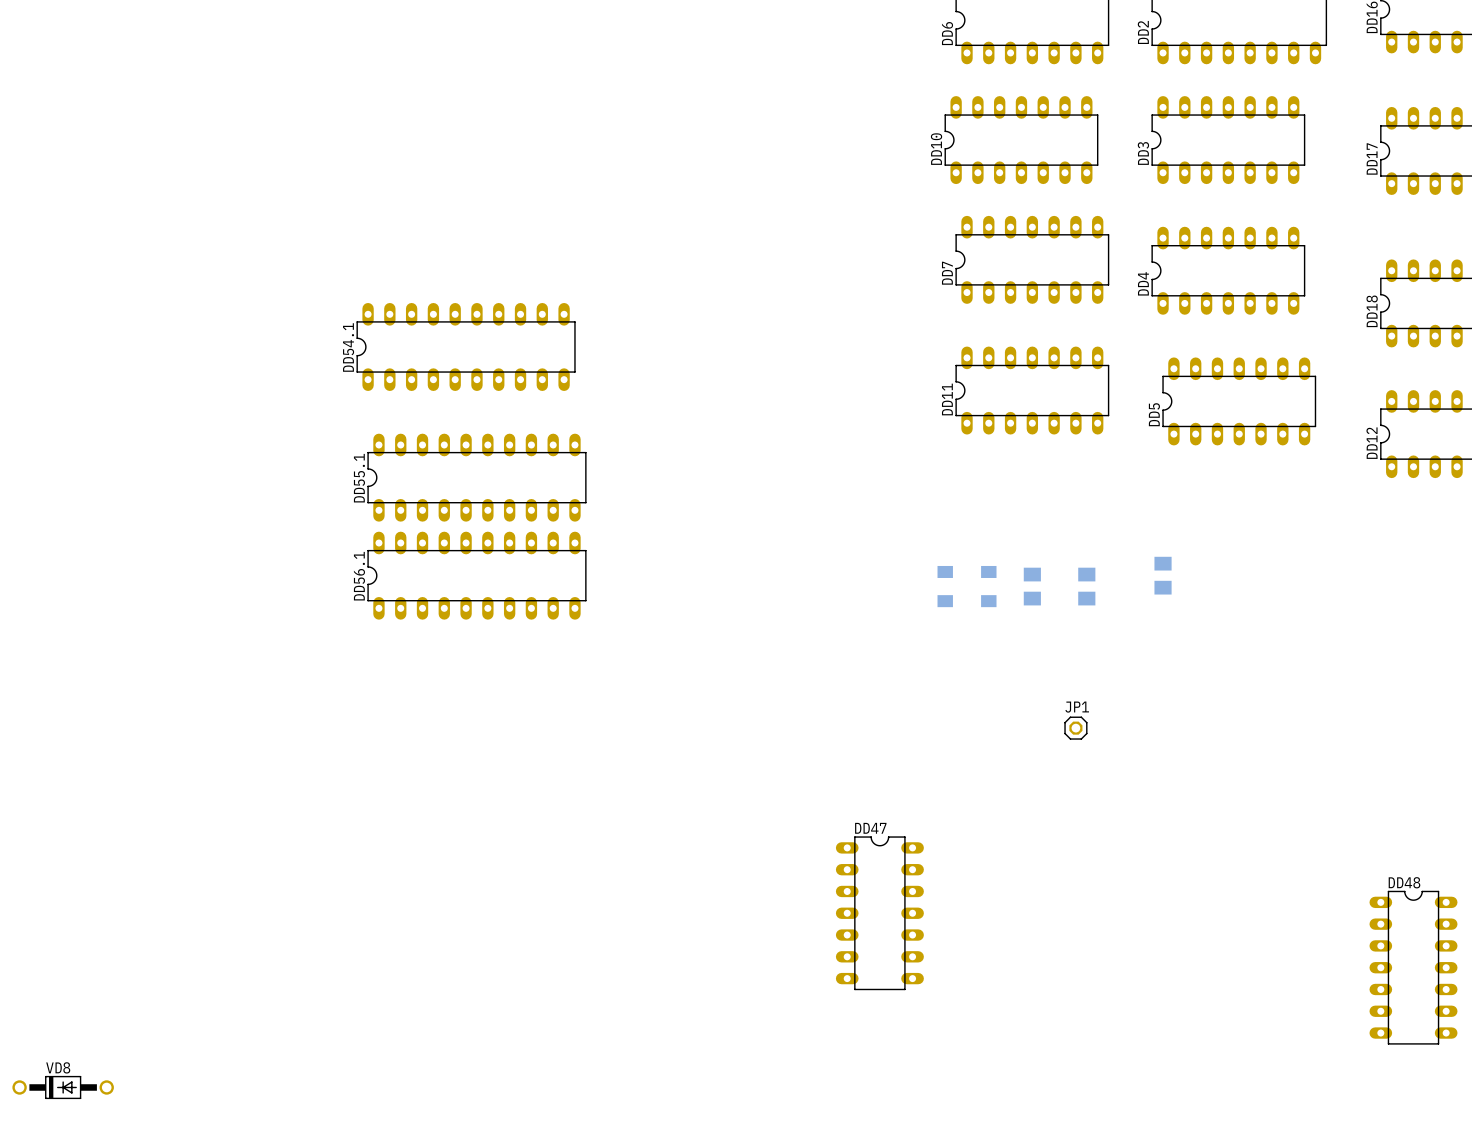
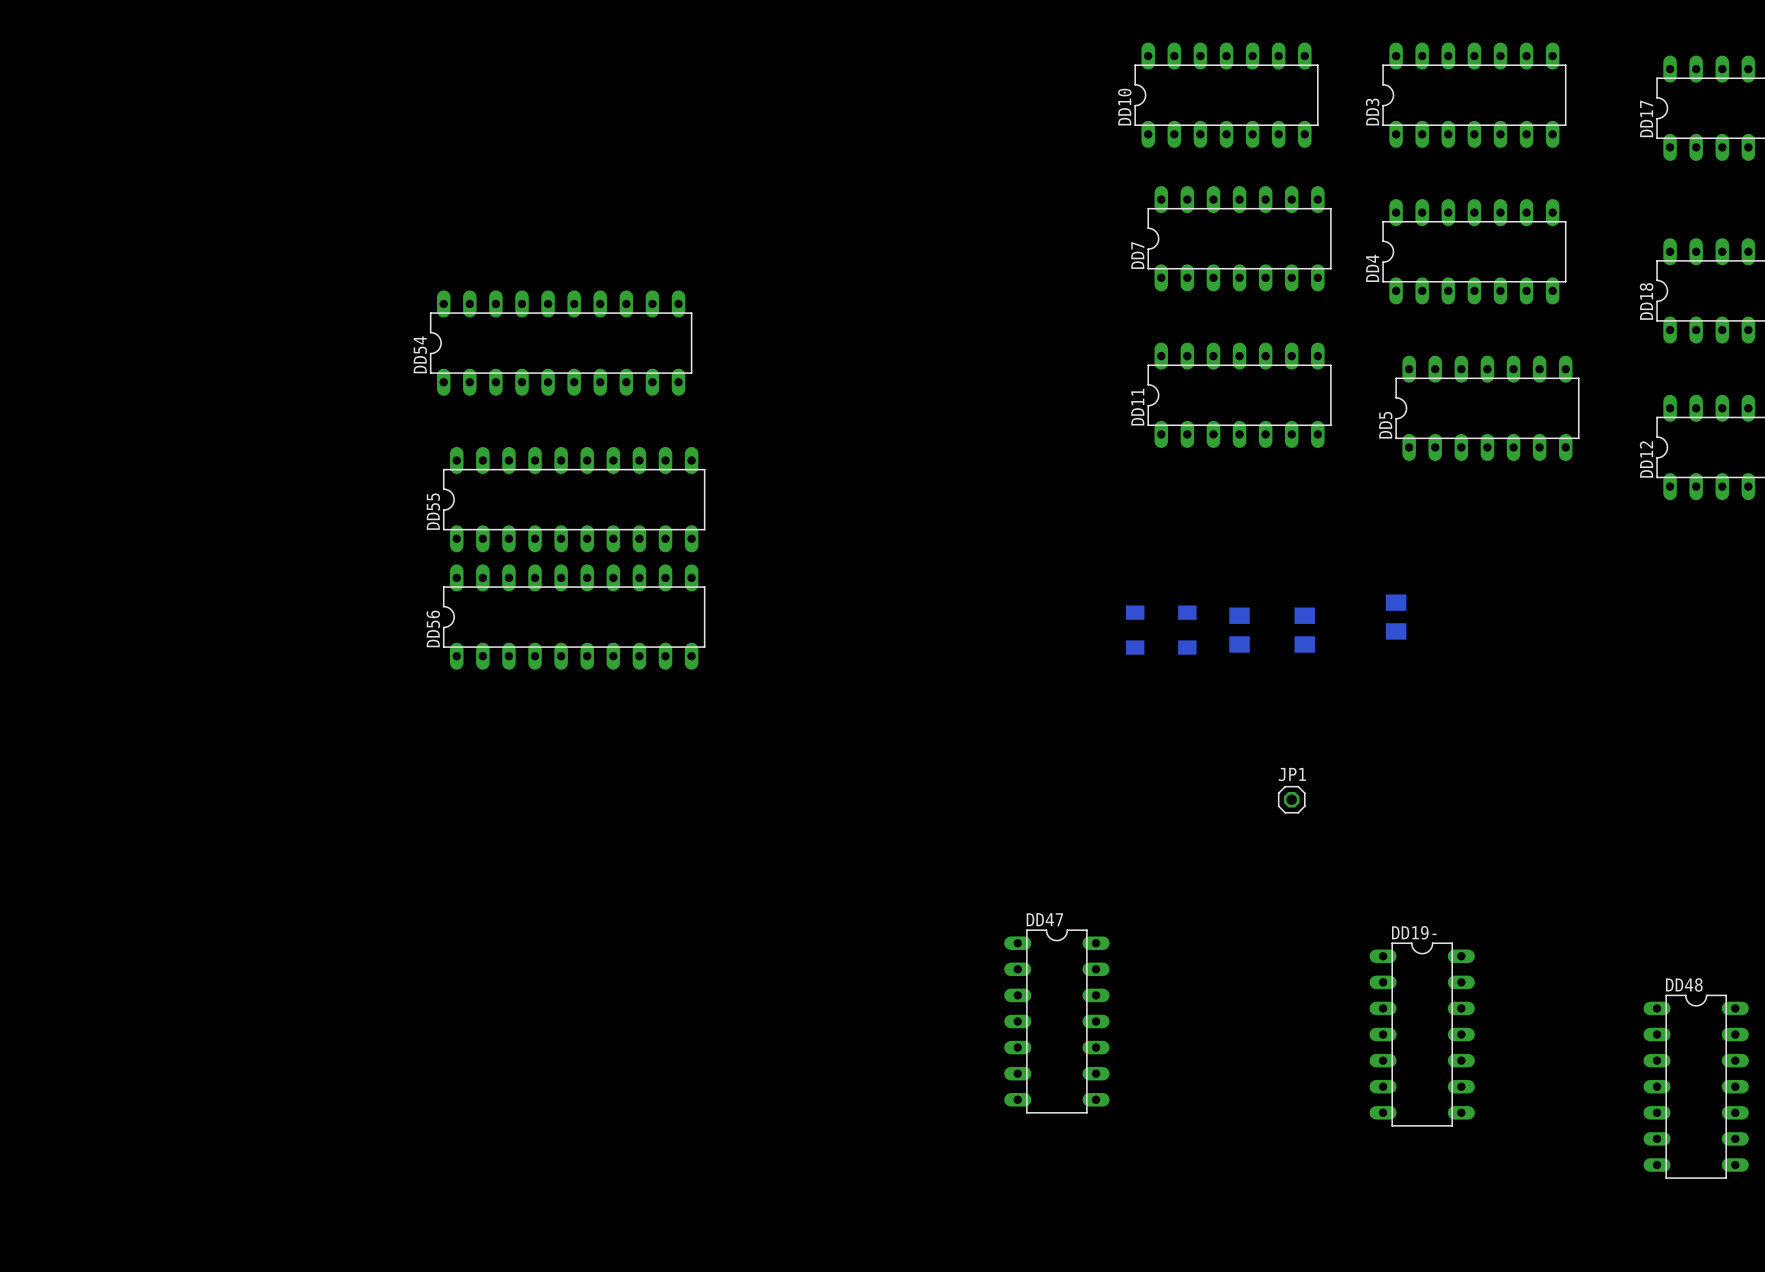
DD54.1 name: DD54.1 (348, 347) -> DD54 (420, 354)
DD55.1 name: DD55.1 (359, 478) -> DD55 (433, 511)
DD56.1 name: DD56.1 (359, 576) -> DD56 (433, 628)
DD19-: none -> (1422, 1034)
VD8: (63, 1087) -> none

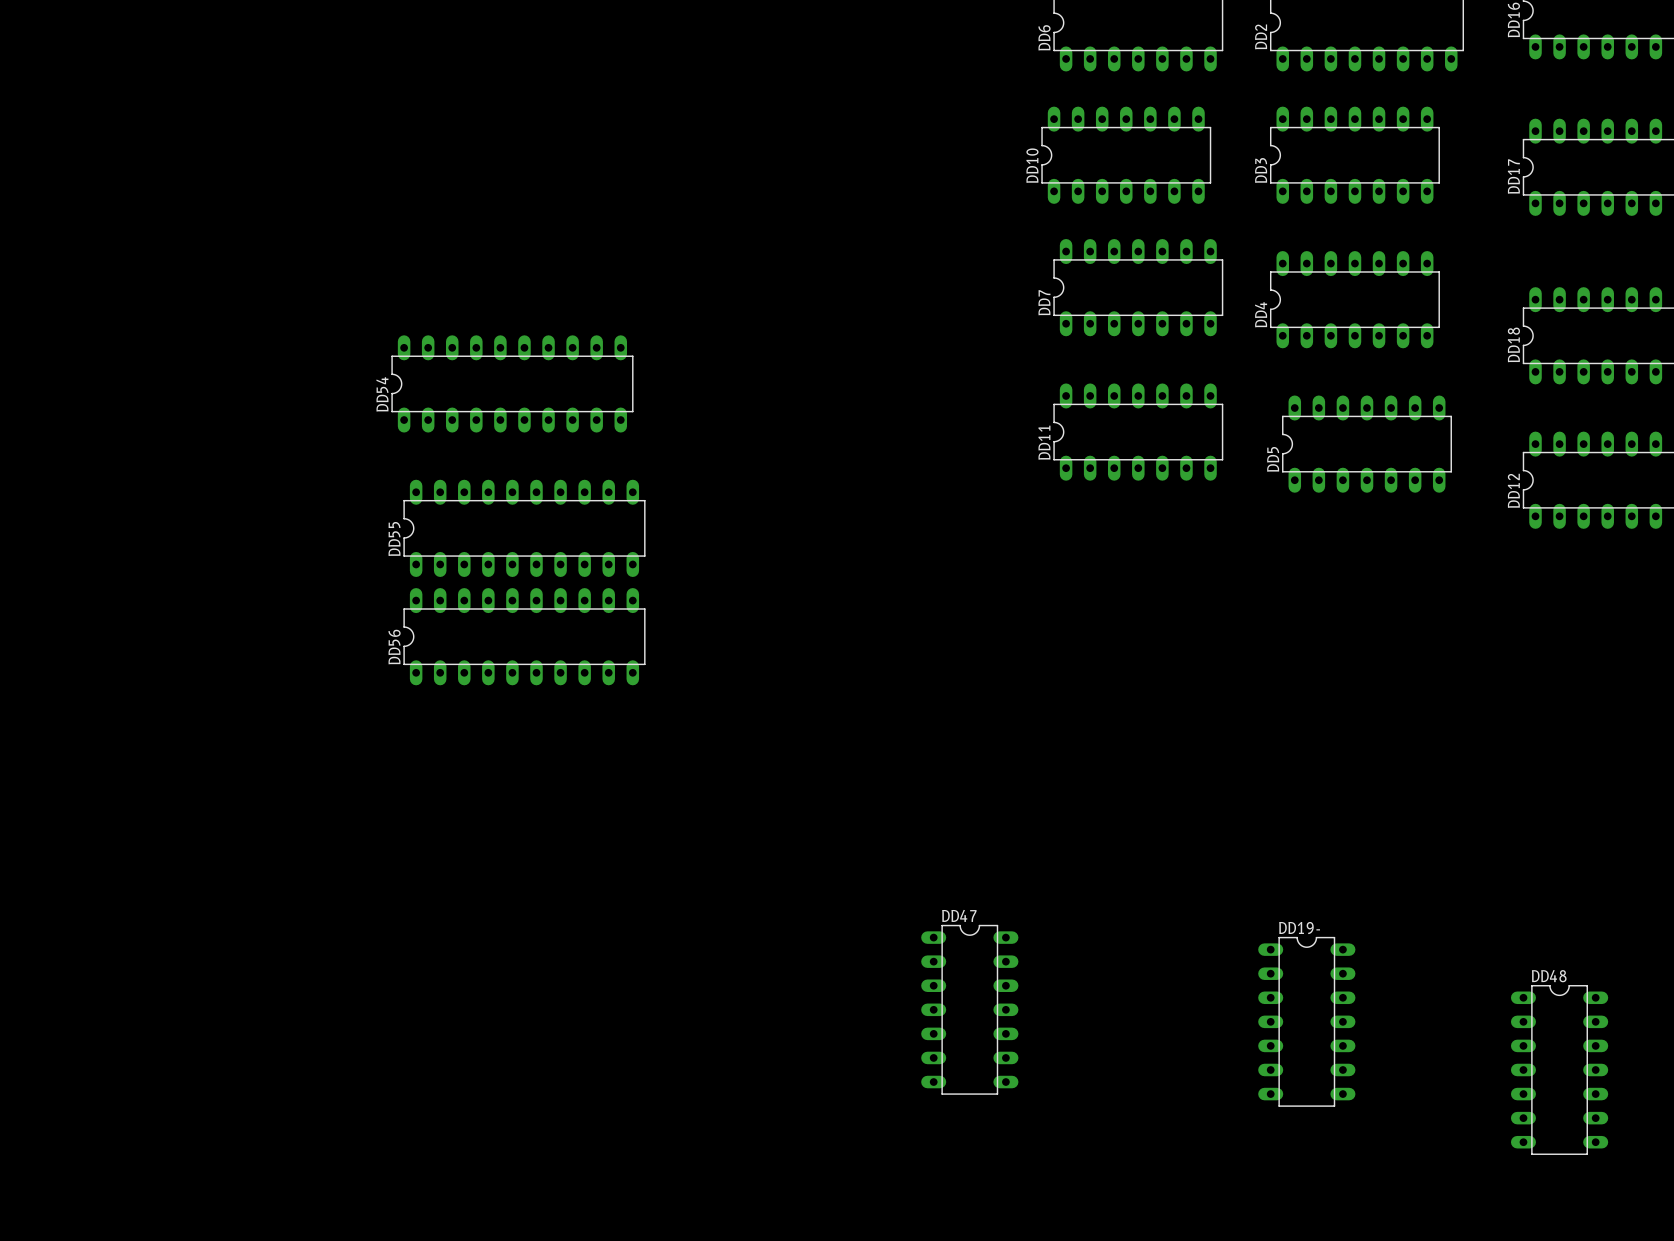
part: (1396, 617) -> none
part: (1135, 630) -> none
part: (1187, 630) -> none
part: (1239, 630) -> none
part: (1304, 630) -> none
JP1: (1291, 799) -> none

